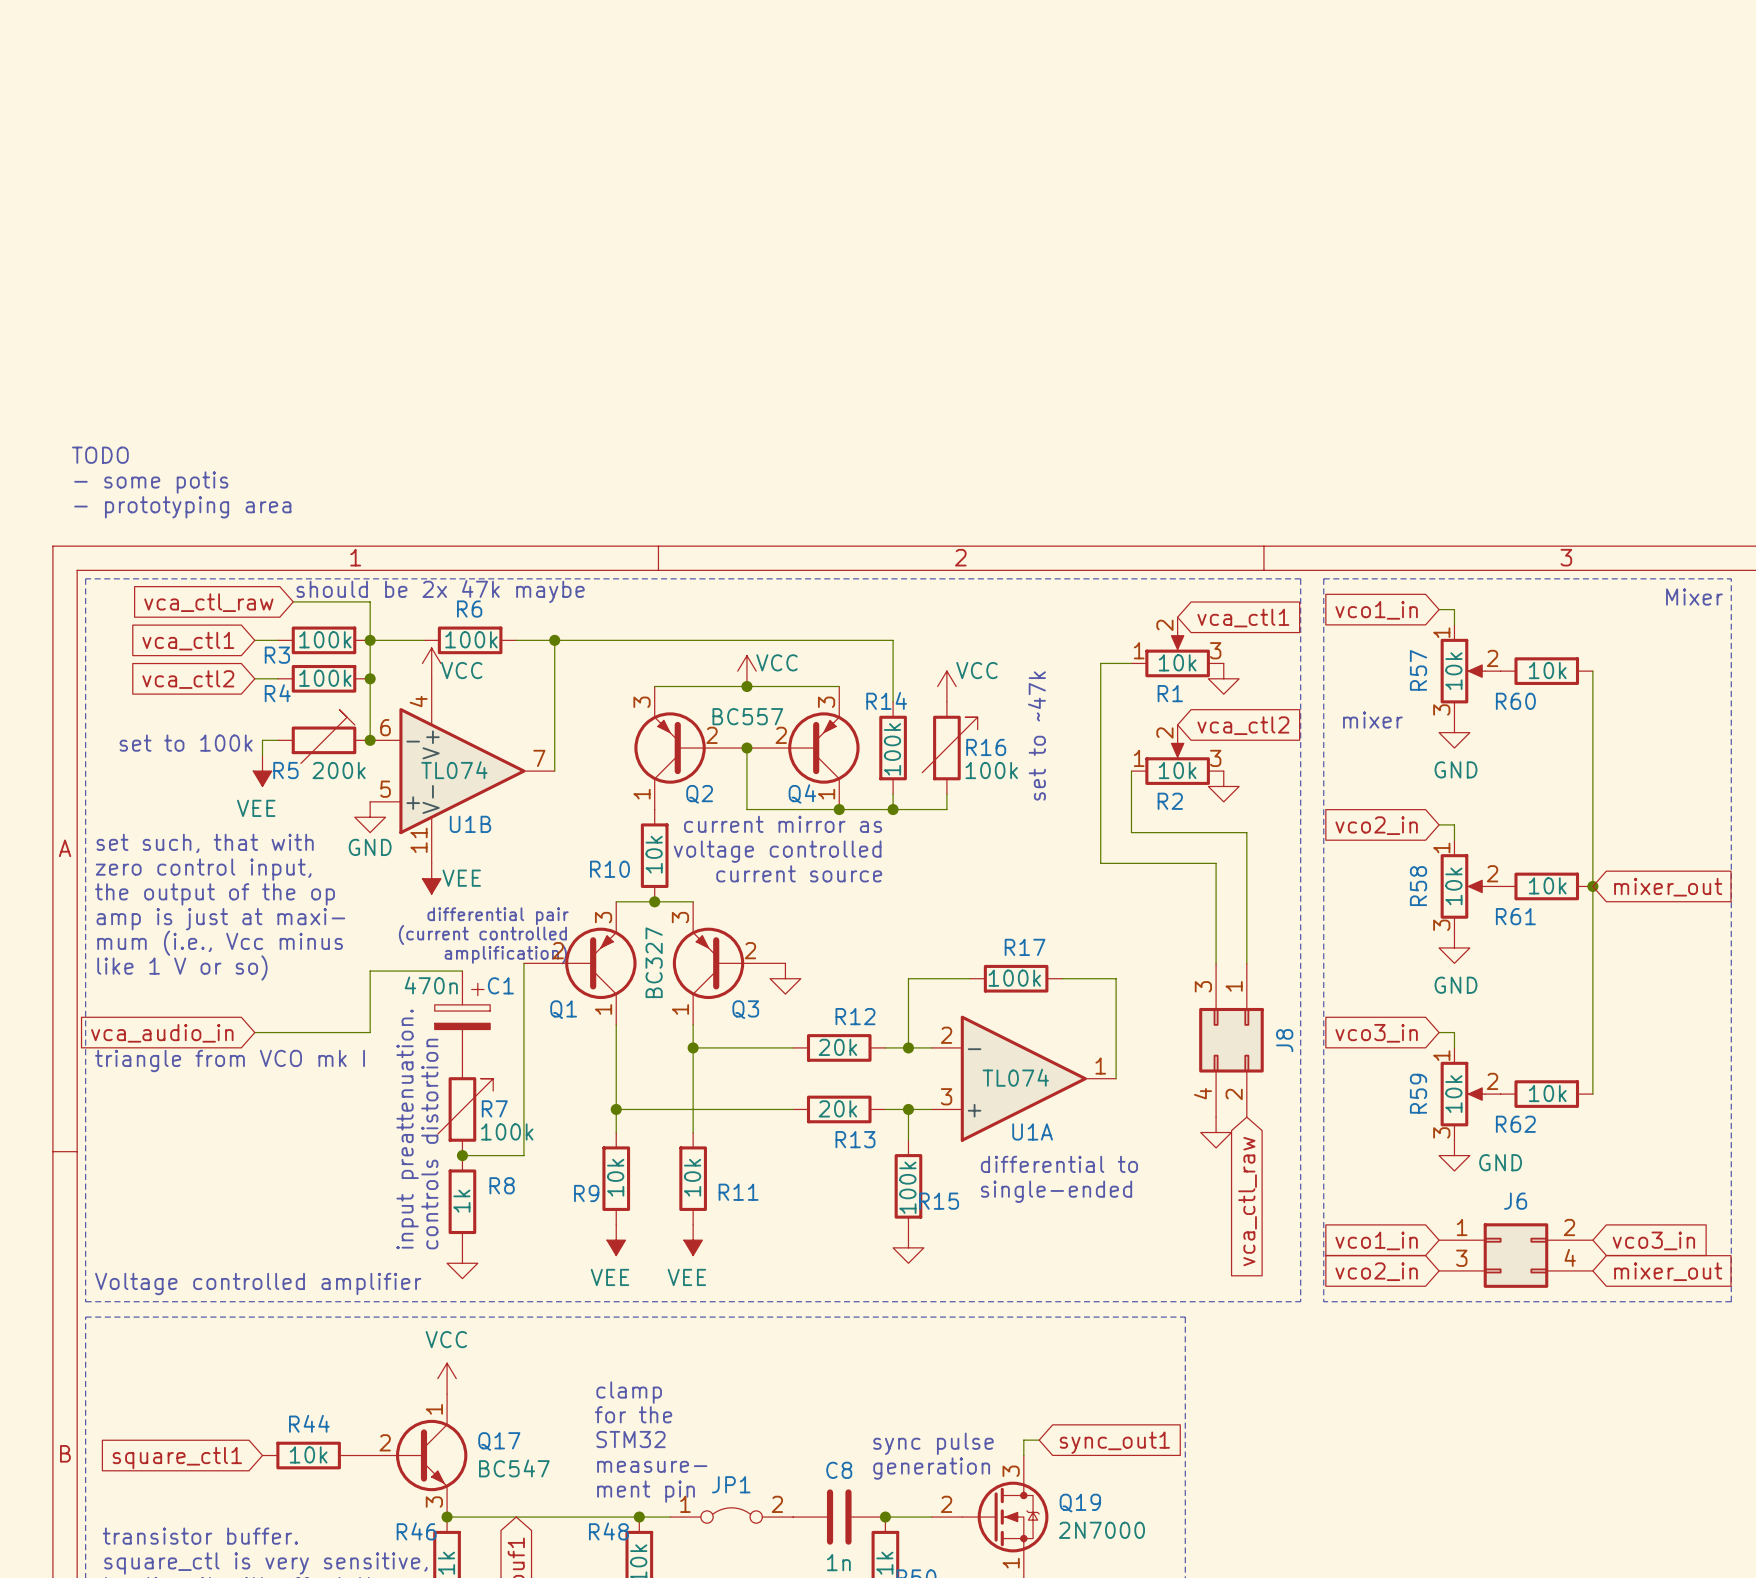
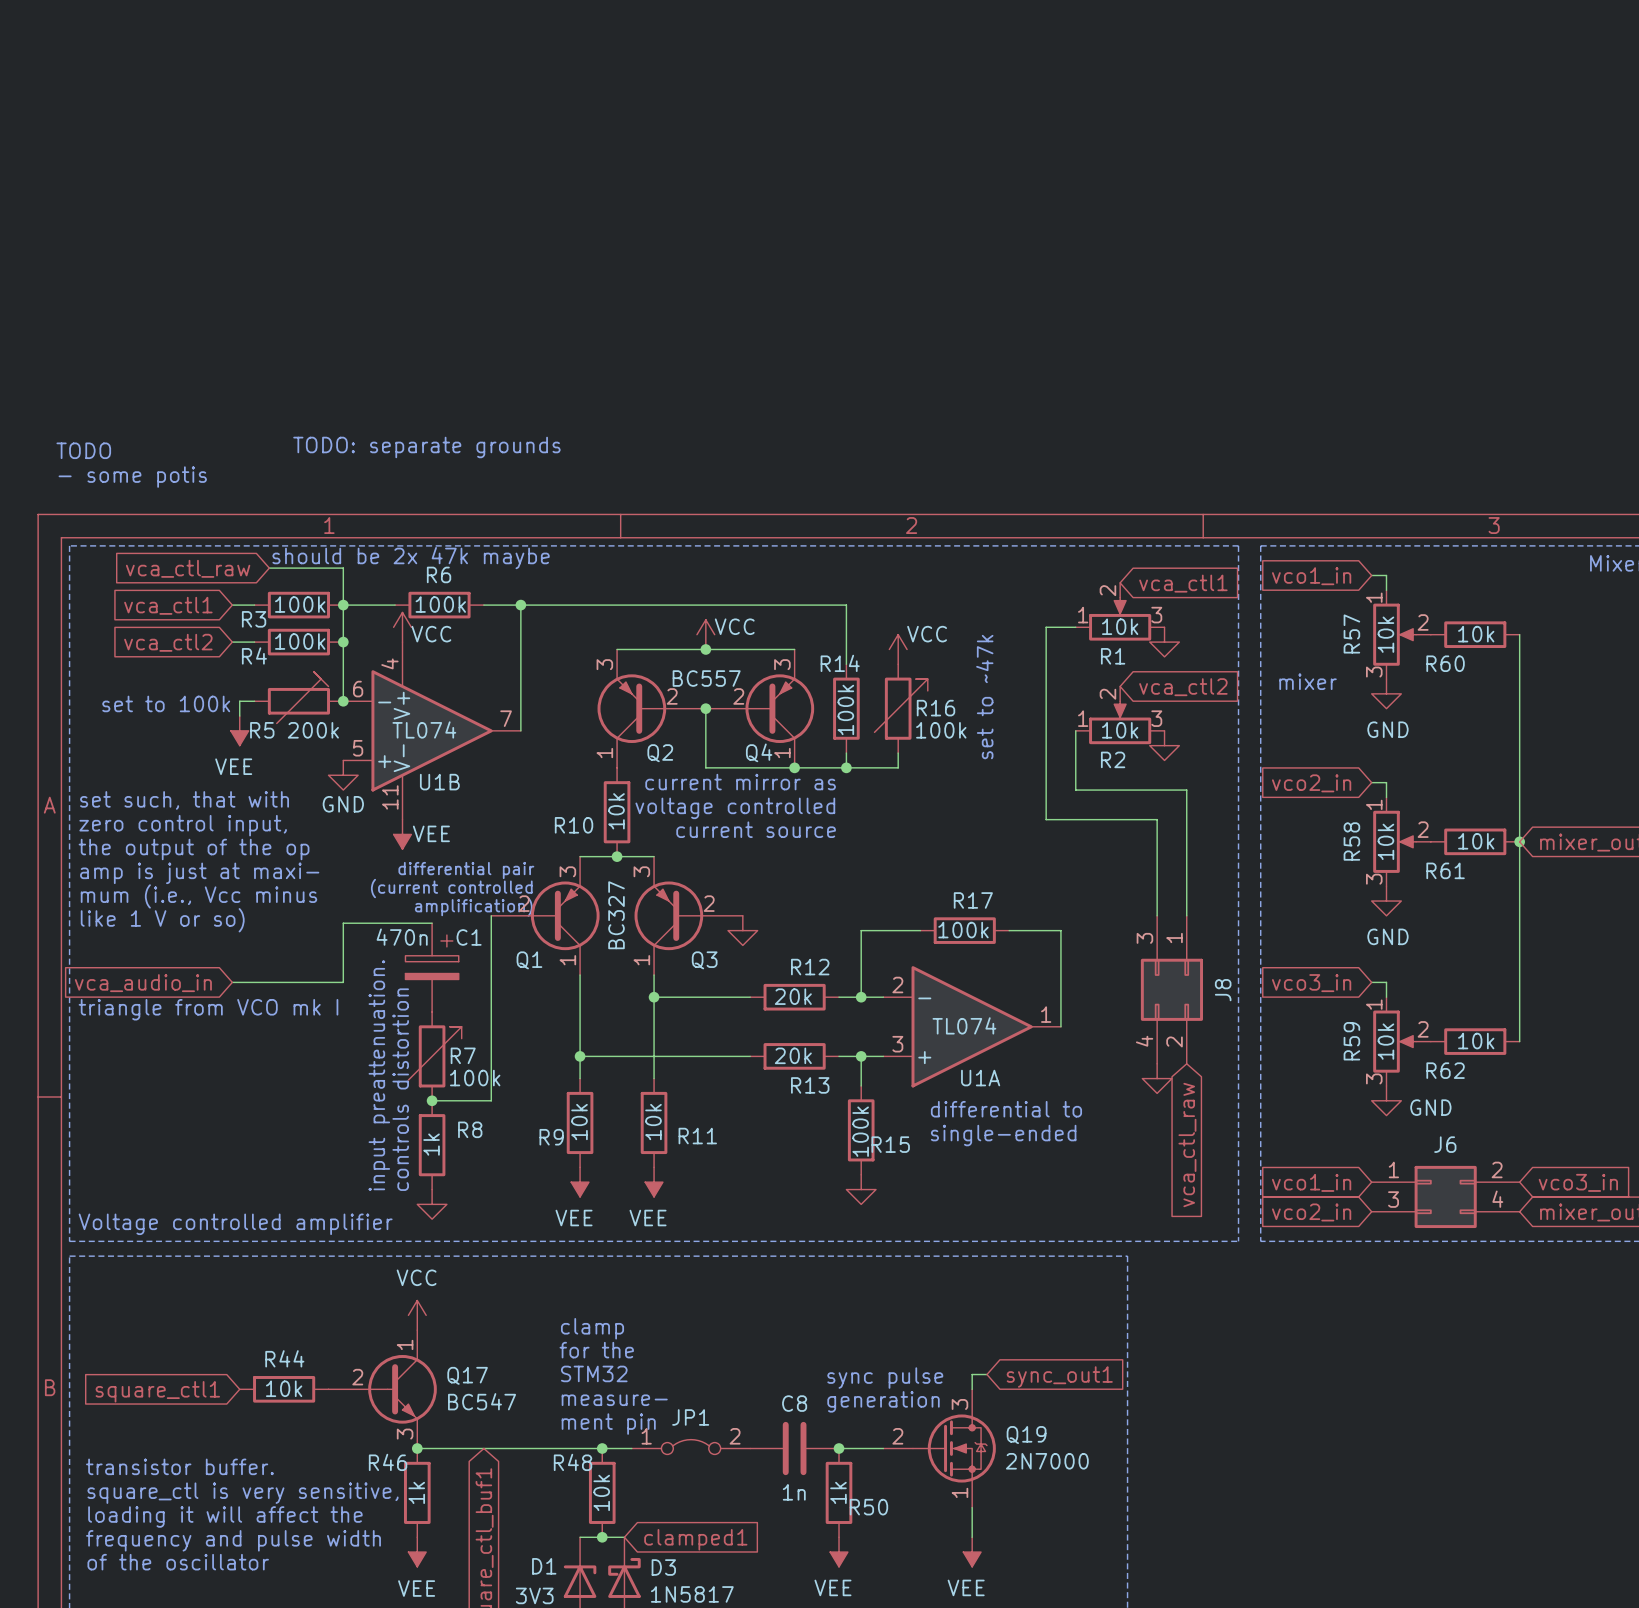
text: TODO (100, 455) -> none
text: none -> TODO: separate grounds (426, 447)
text: - some potis (151, 482) -> TODO (83, 450)
text: - prototyping area (182, 507) -> - some potis (132, 477)

